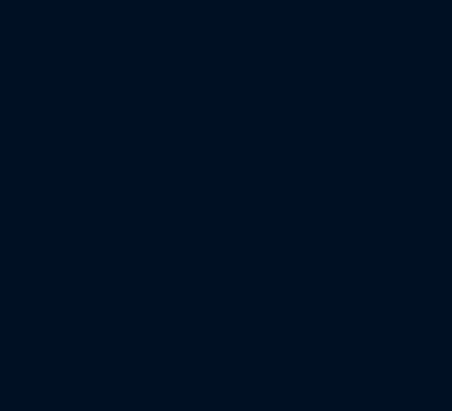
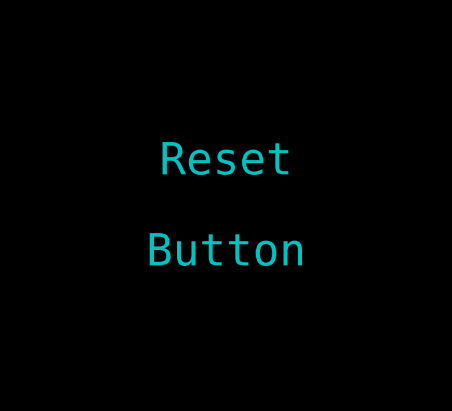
text: none -> Reset (225, 158)
text: none -> Button (225, 249)

